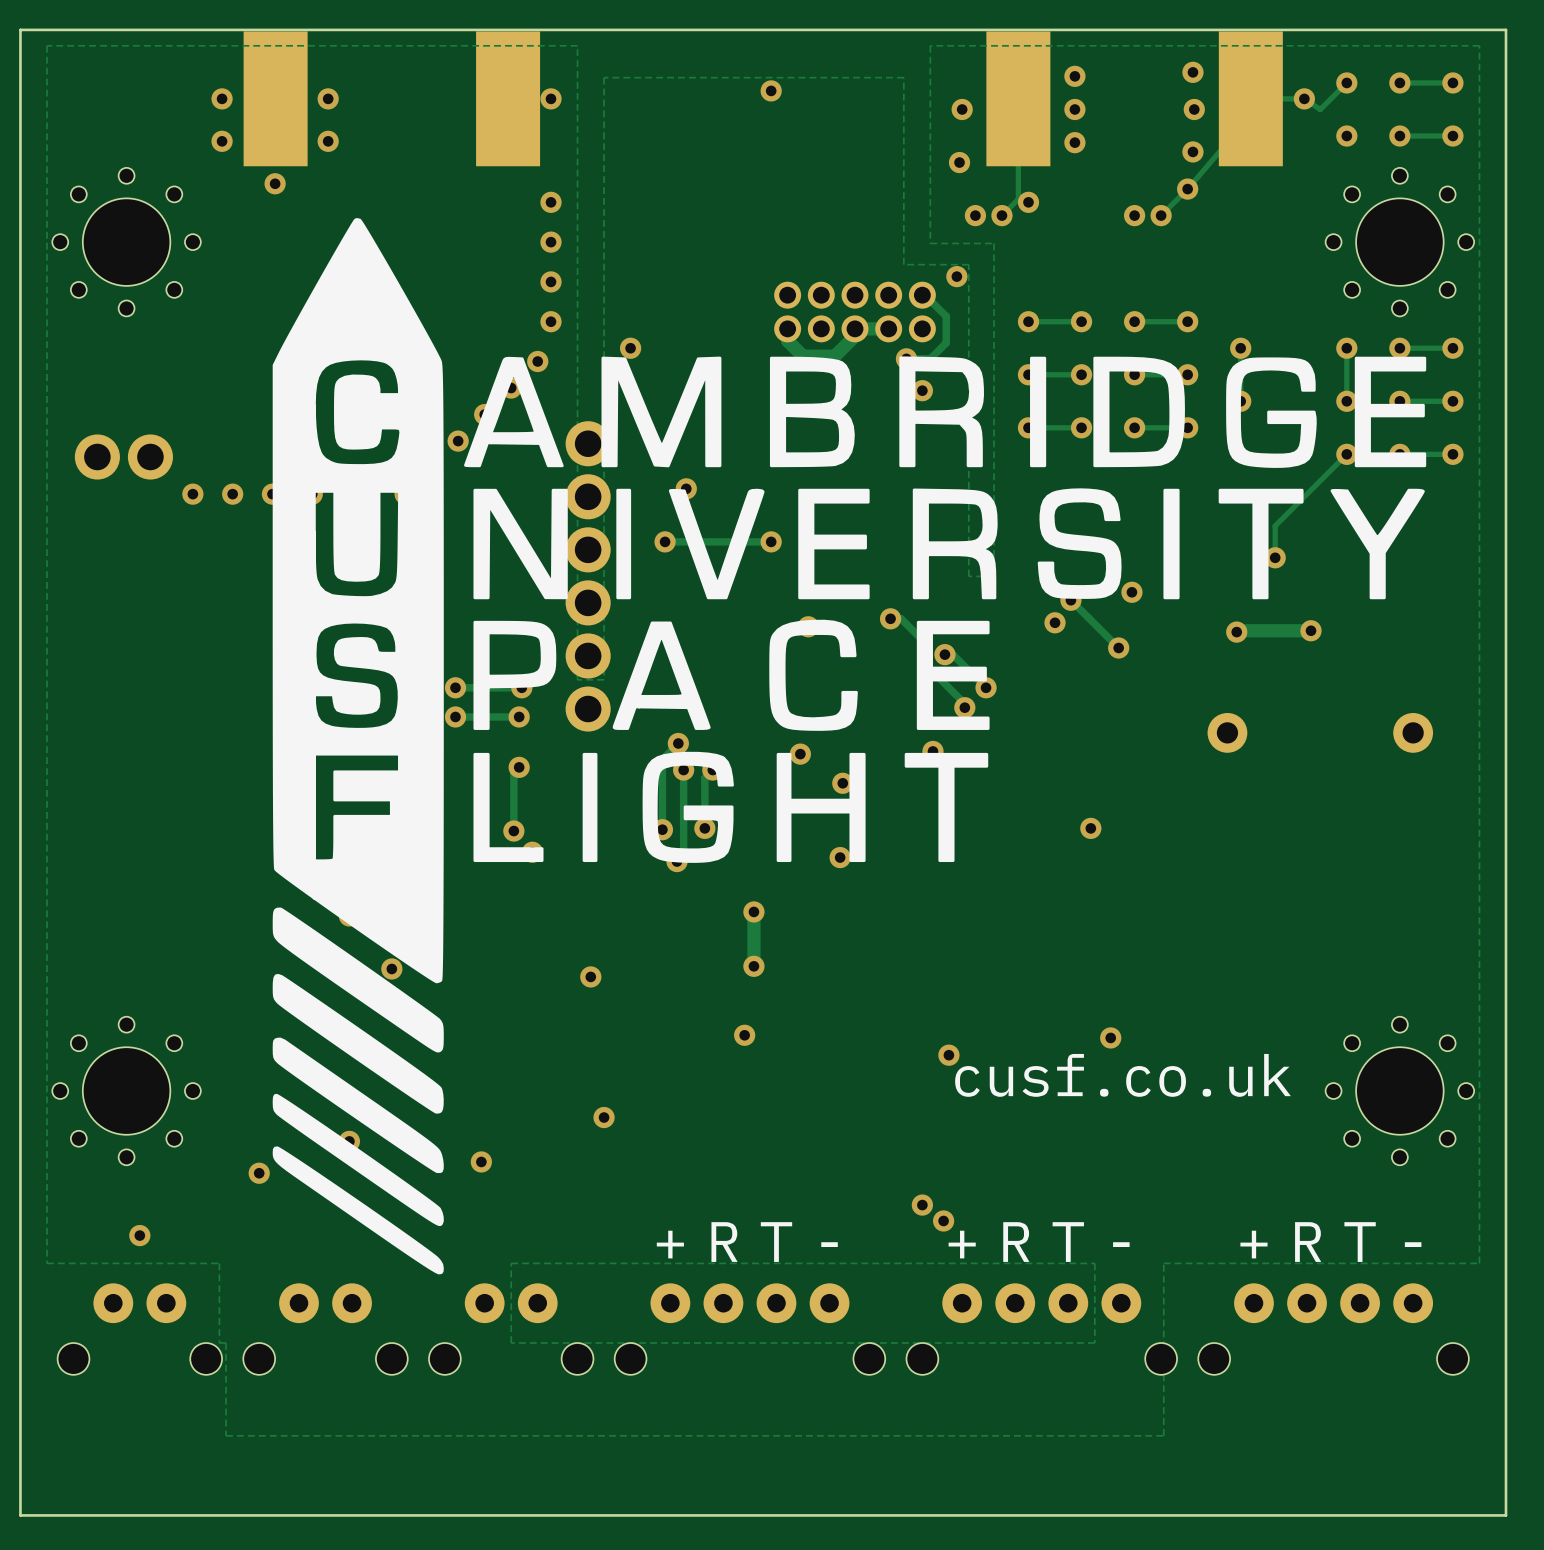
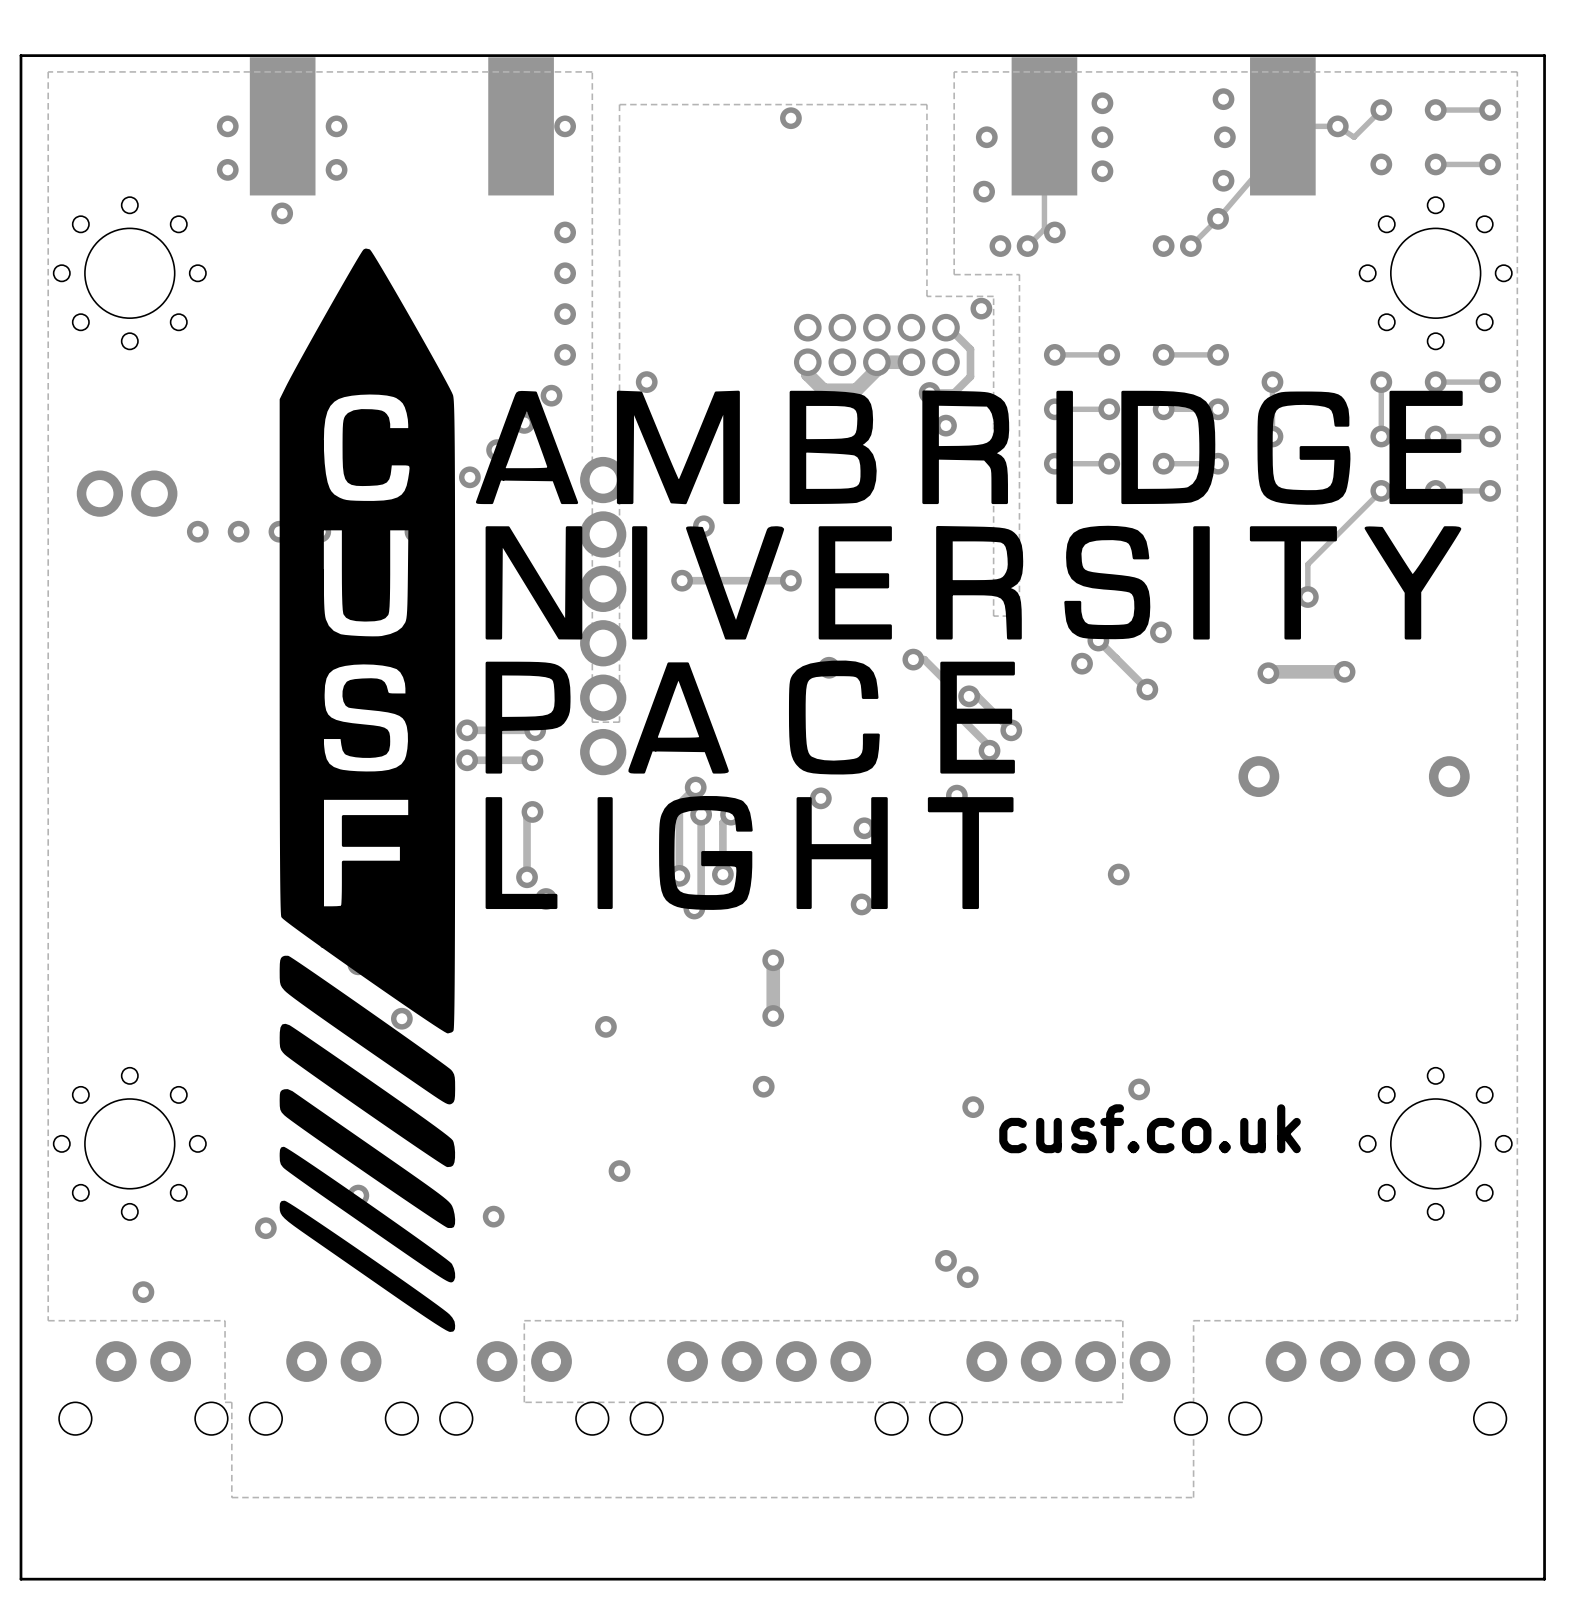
text: R (724, 1242) -> none
text: T (776, 1242) -> none
text: R (1016, 1242) -> none
text: T (1068, 1242) -> none
text: R (1308, 1242) -> none
text: T (1360, 1242) -> none
text: + (670, 1244) -> none
text: - (829, 1244) -> none
text: + (962, 1244) -> none
text: - (1121, 1244) -> none
text: + (1253, 1244) -> none
text: - (1413, 1244) -> none

